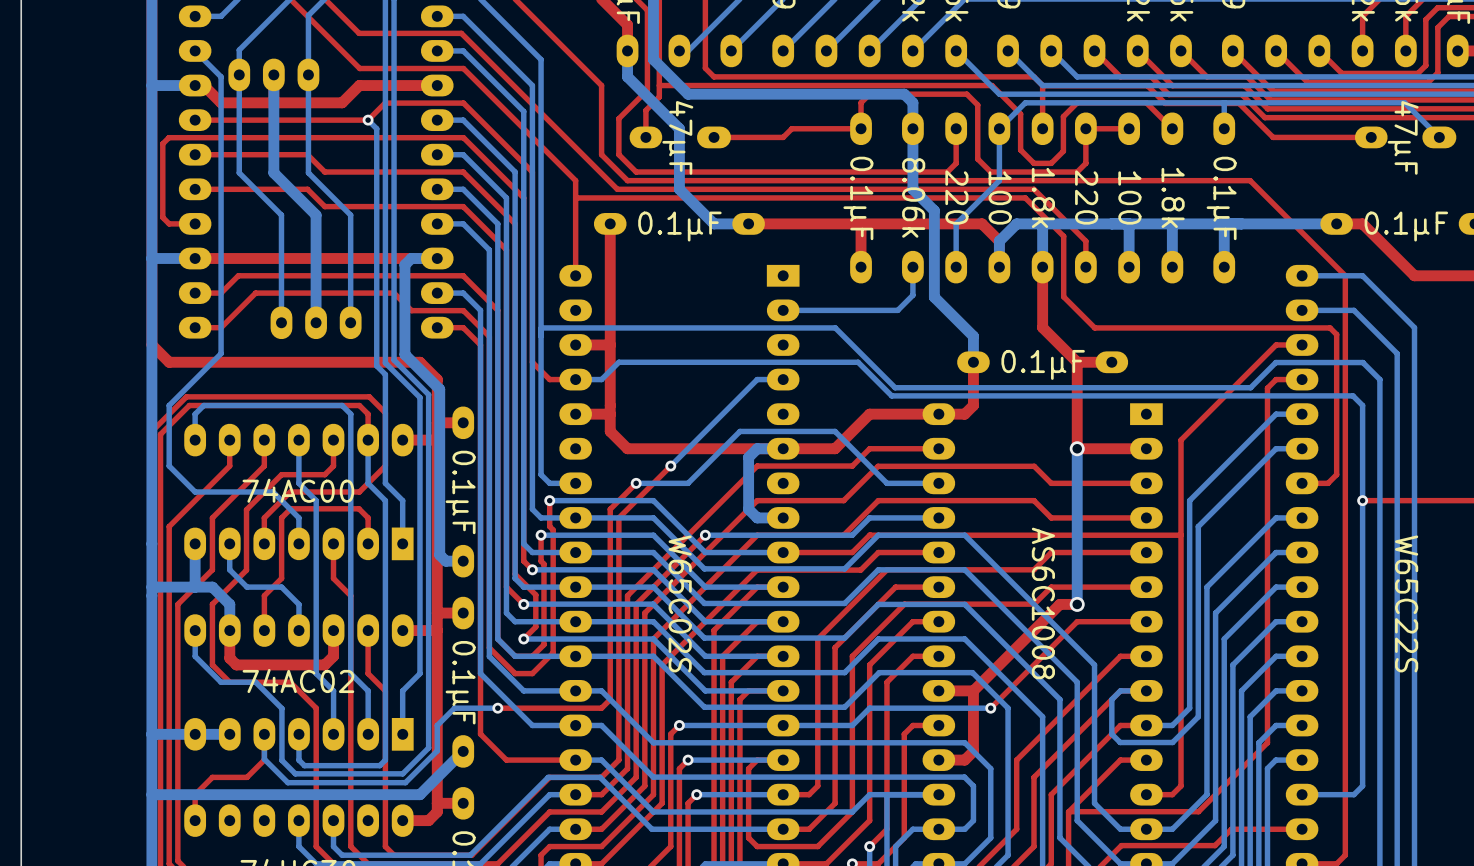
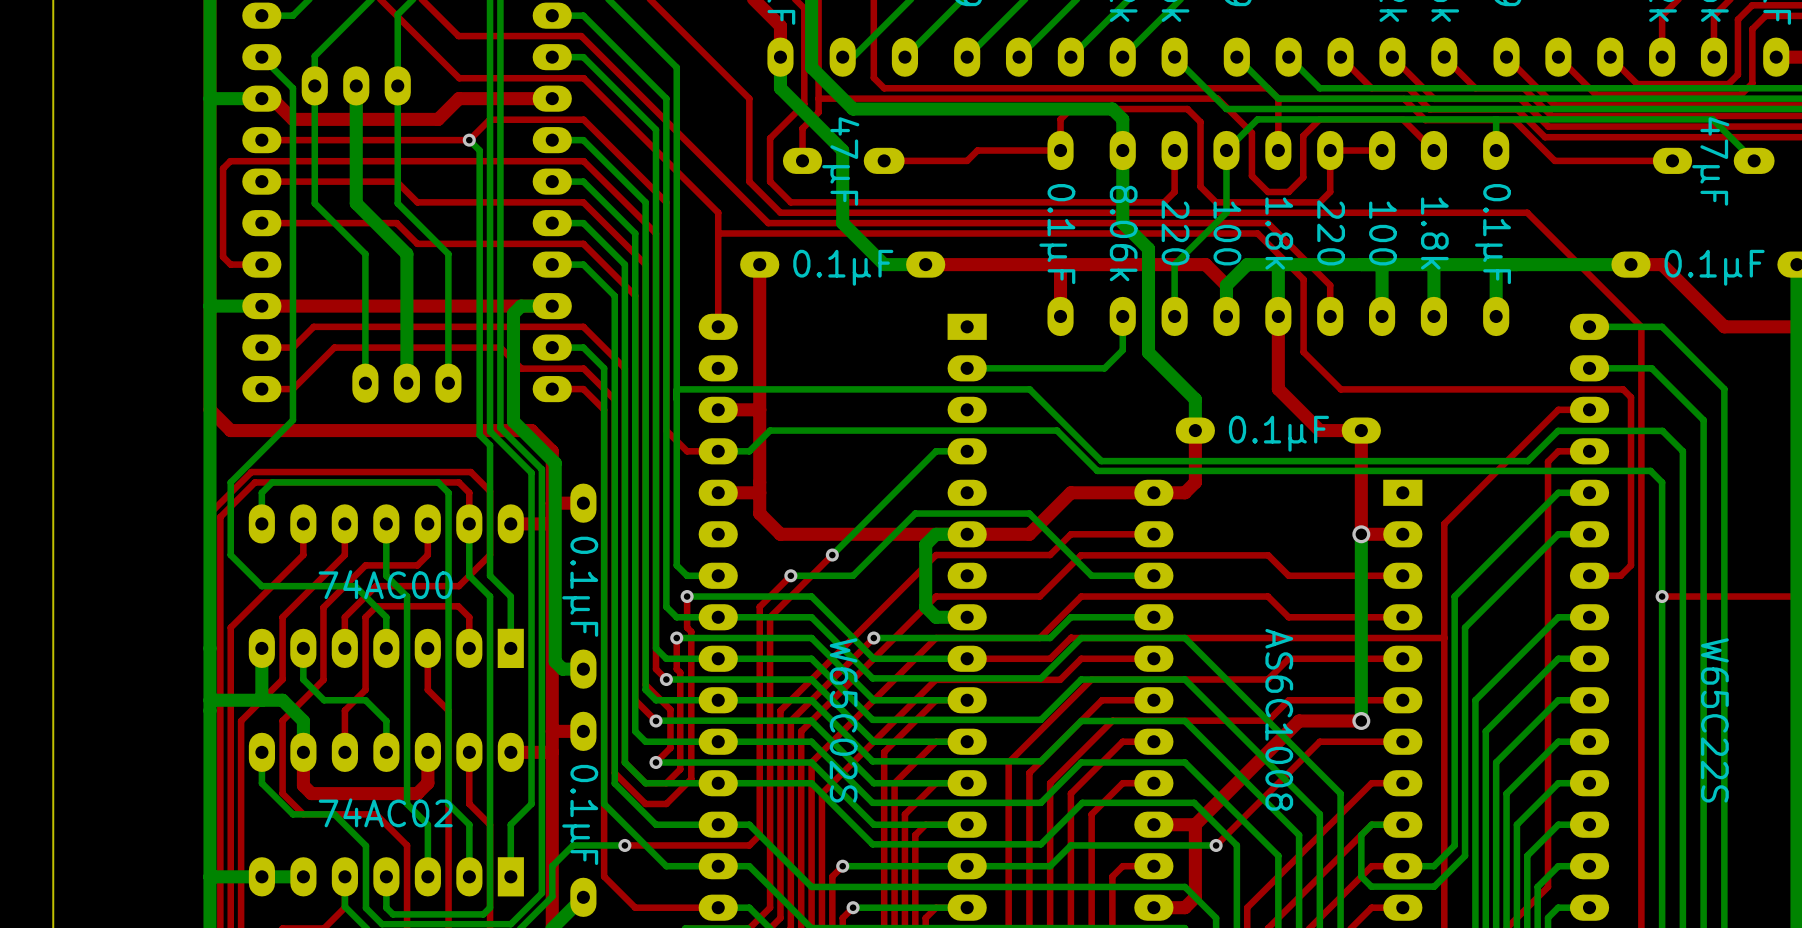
top track: (1077, 362) (1077, 448) (1111, 448) -> (1361, 430) (1361, 534)
bottom track: (1077, 448) (1077, 604) -> (1361, 534) (1361, 720)
via position: (1077, 448) -> (1361, 534)
via position: (1077, 604) -> (1361, 720)
top track: none -> (1361, 720) (1319, 720)

